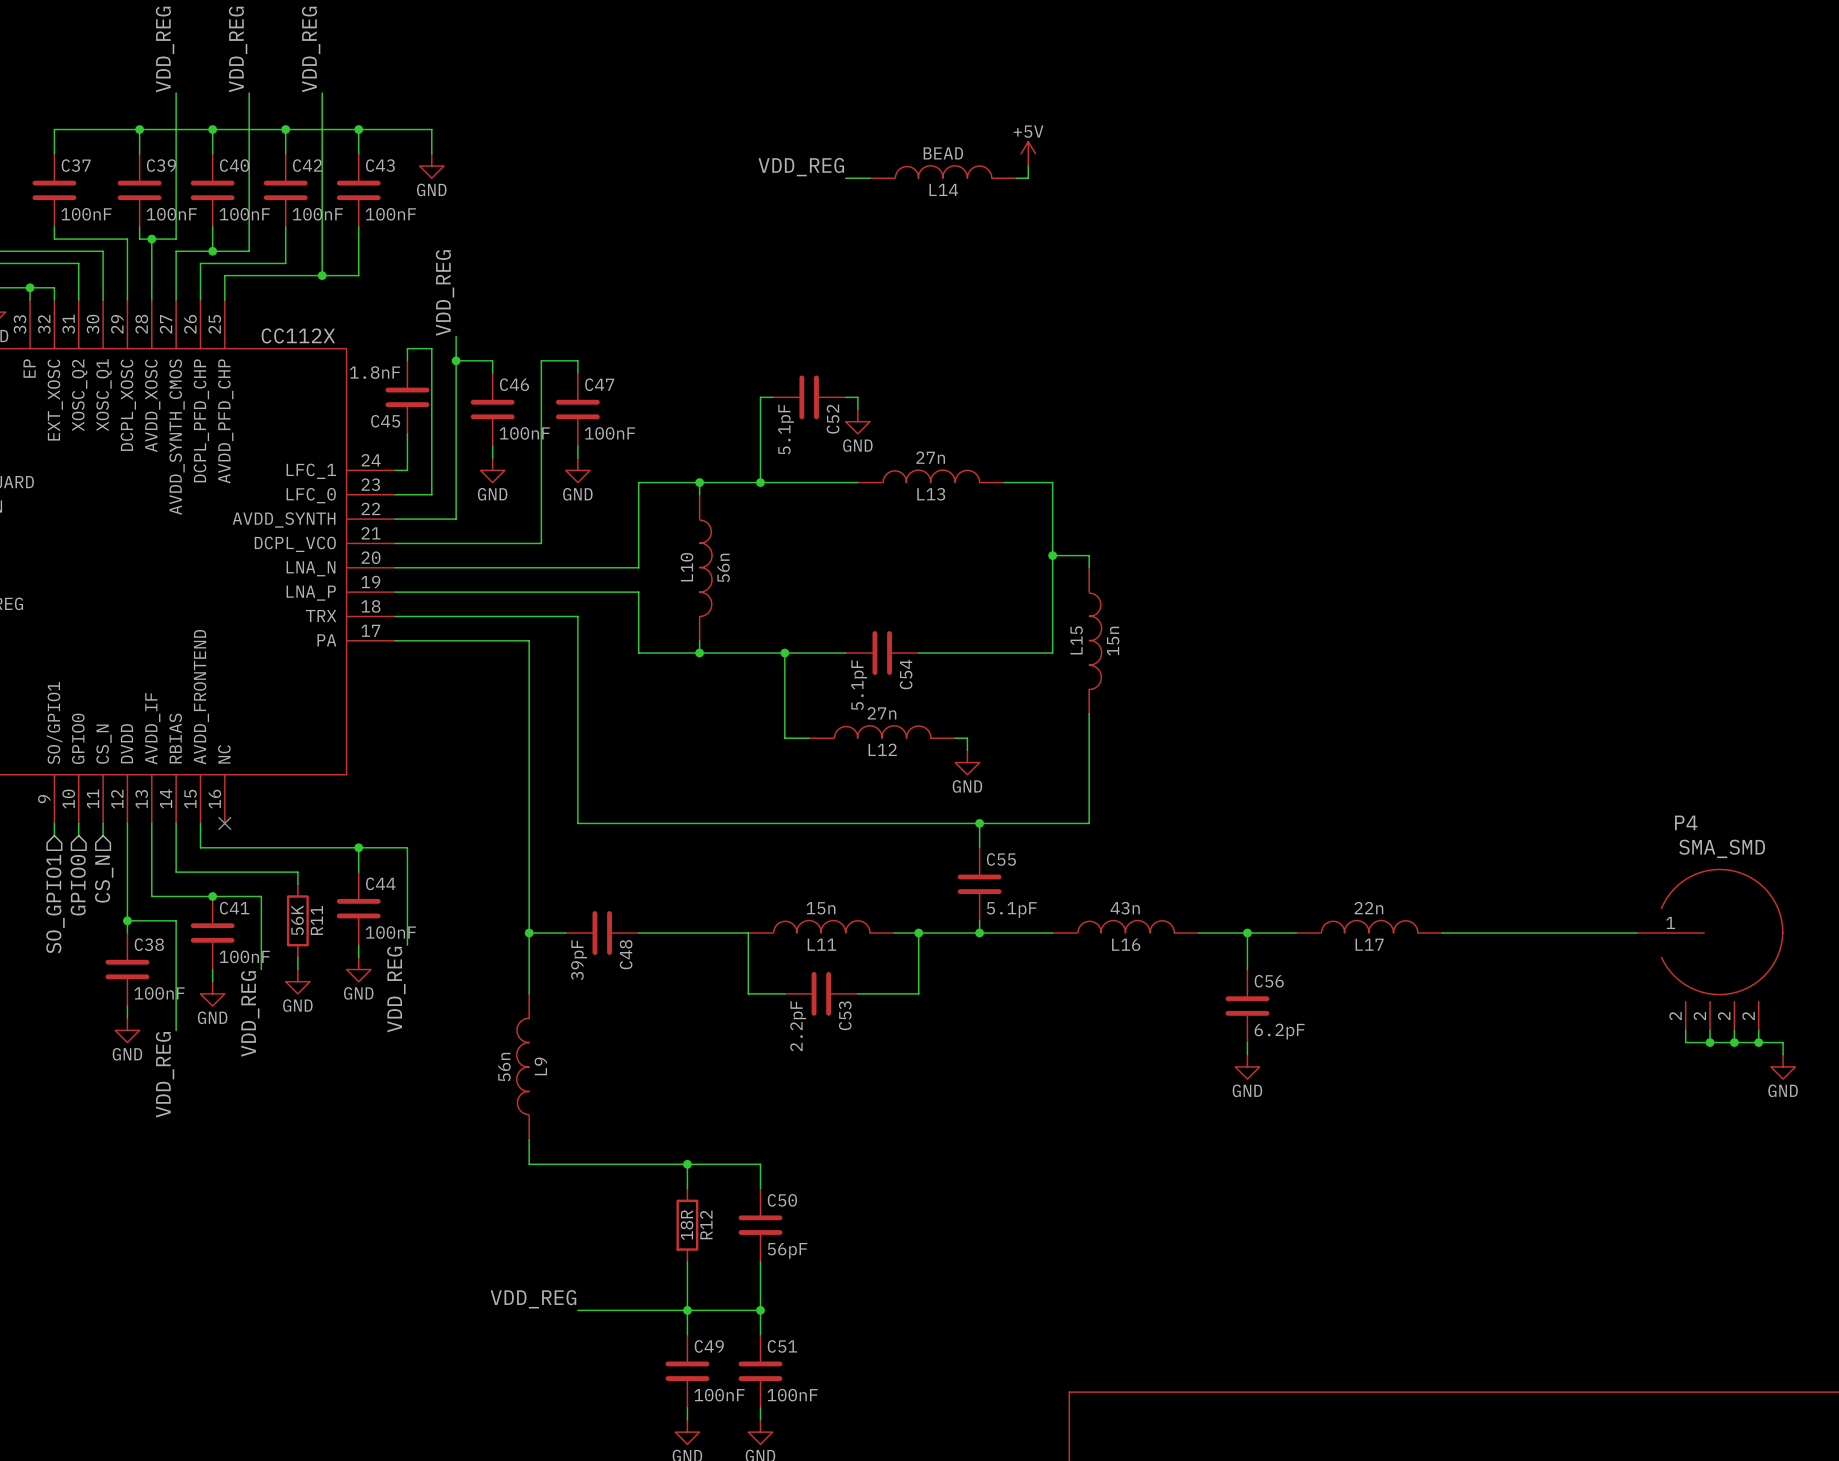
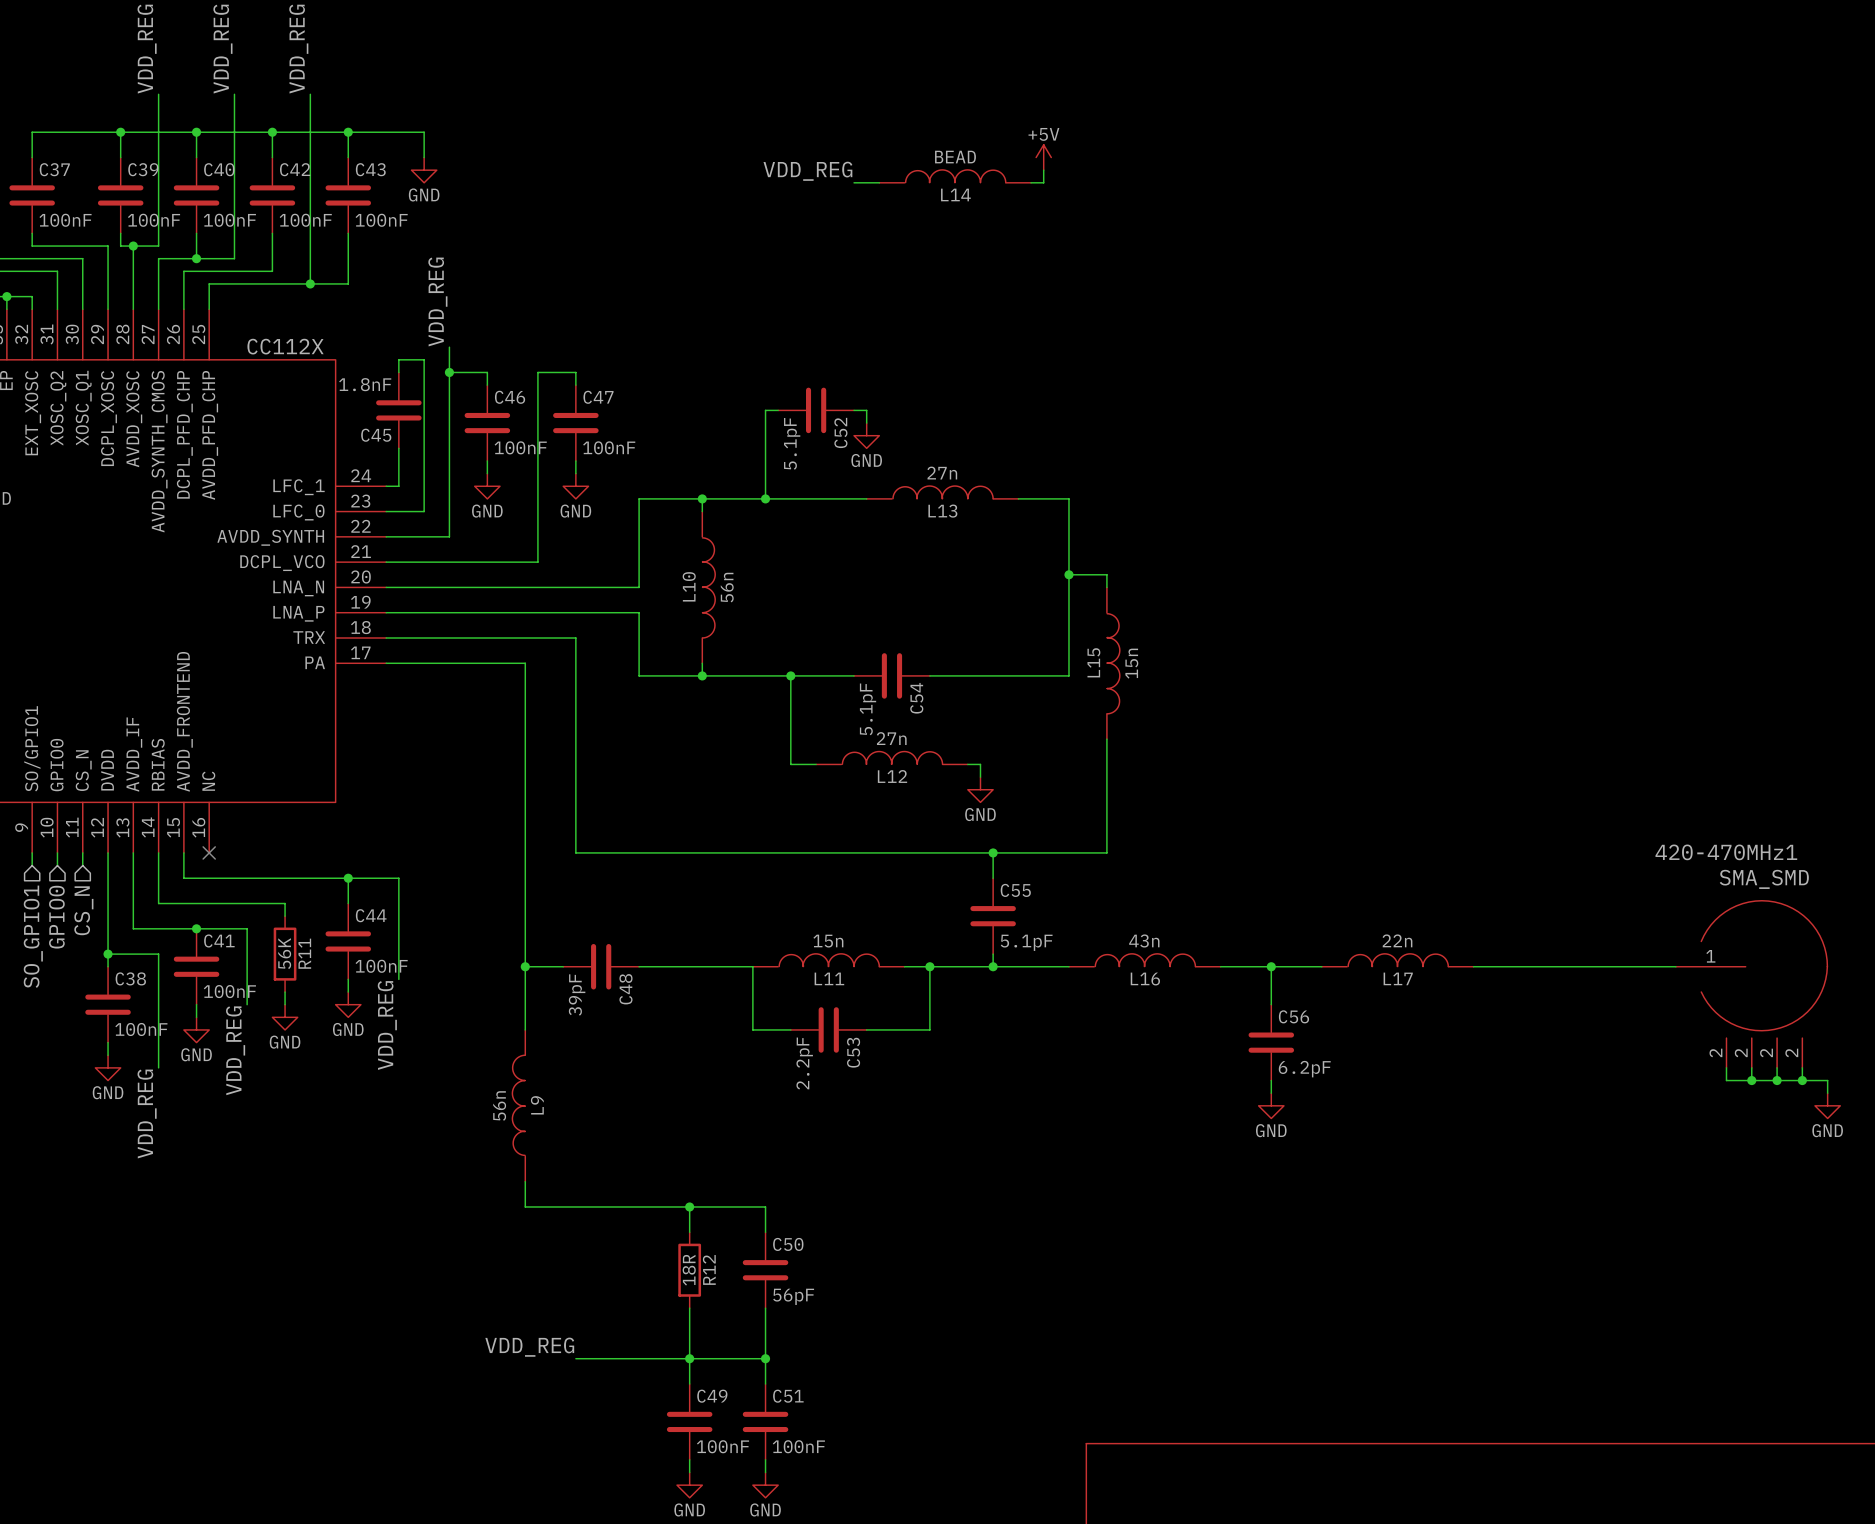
P4 name: P4 (1686, 822) -> 420-470MHz1 (1726, 852)

